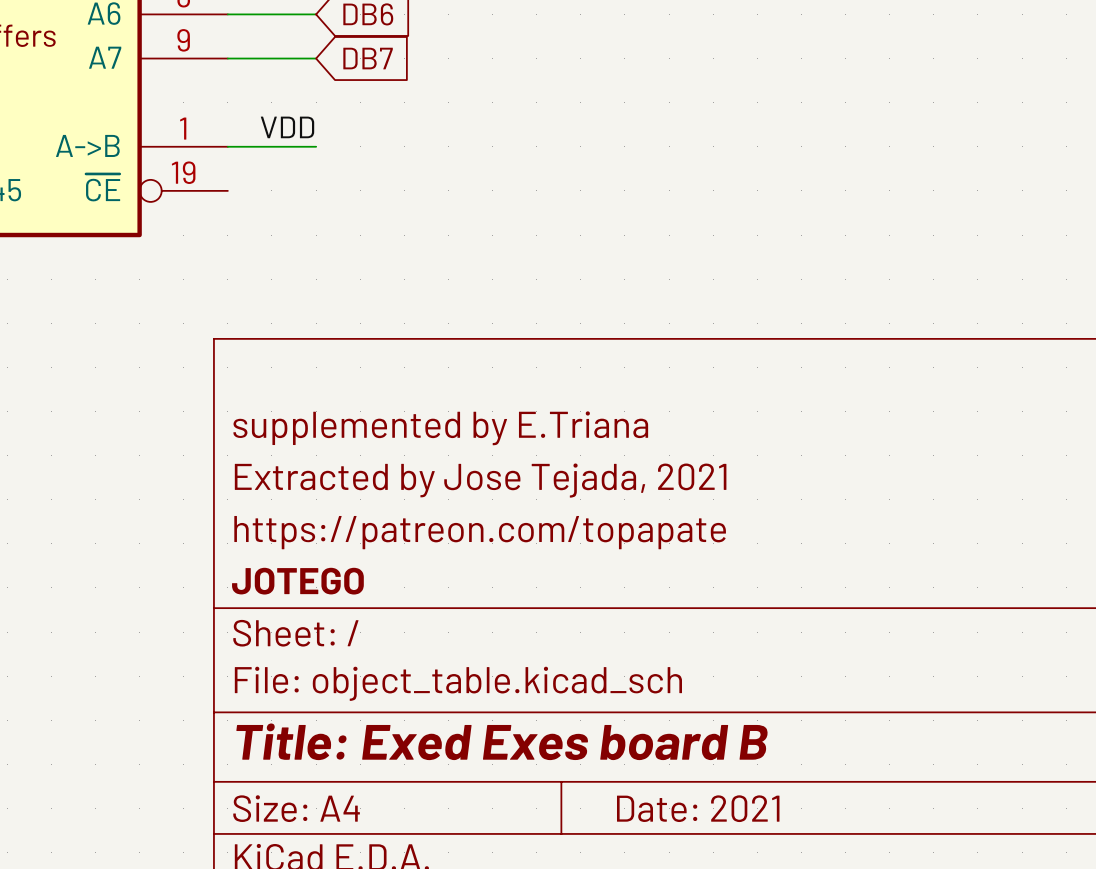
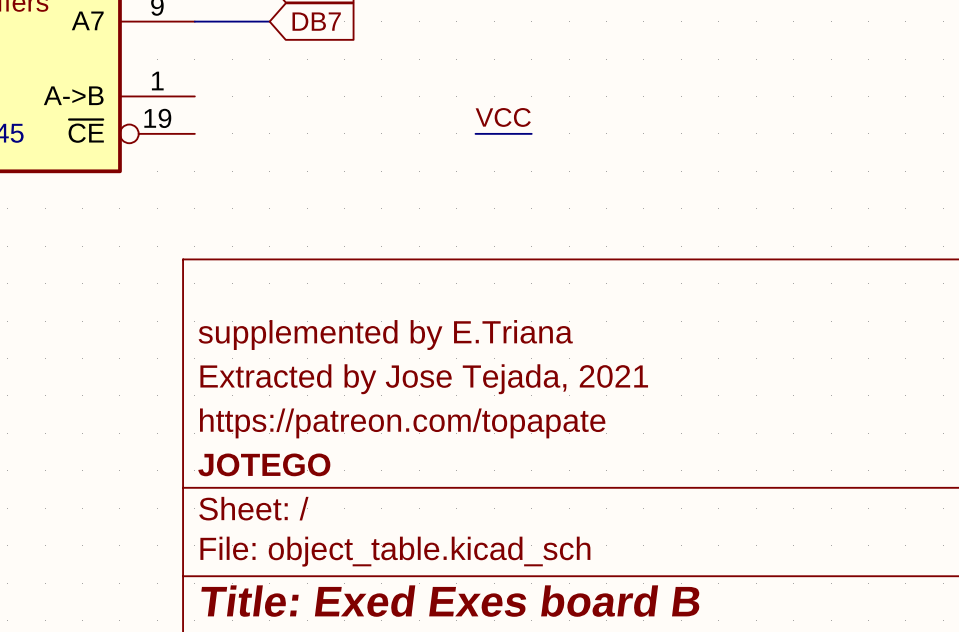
label: VDD (287, 127) -> none
wire: (227, 146) (316, 146) -> none
label: none -> VCC (503, 117)
wire: none -> (475, 133) (531, 133)

